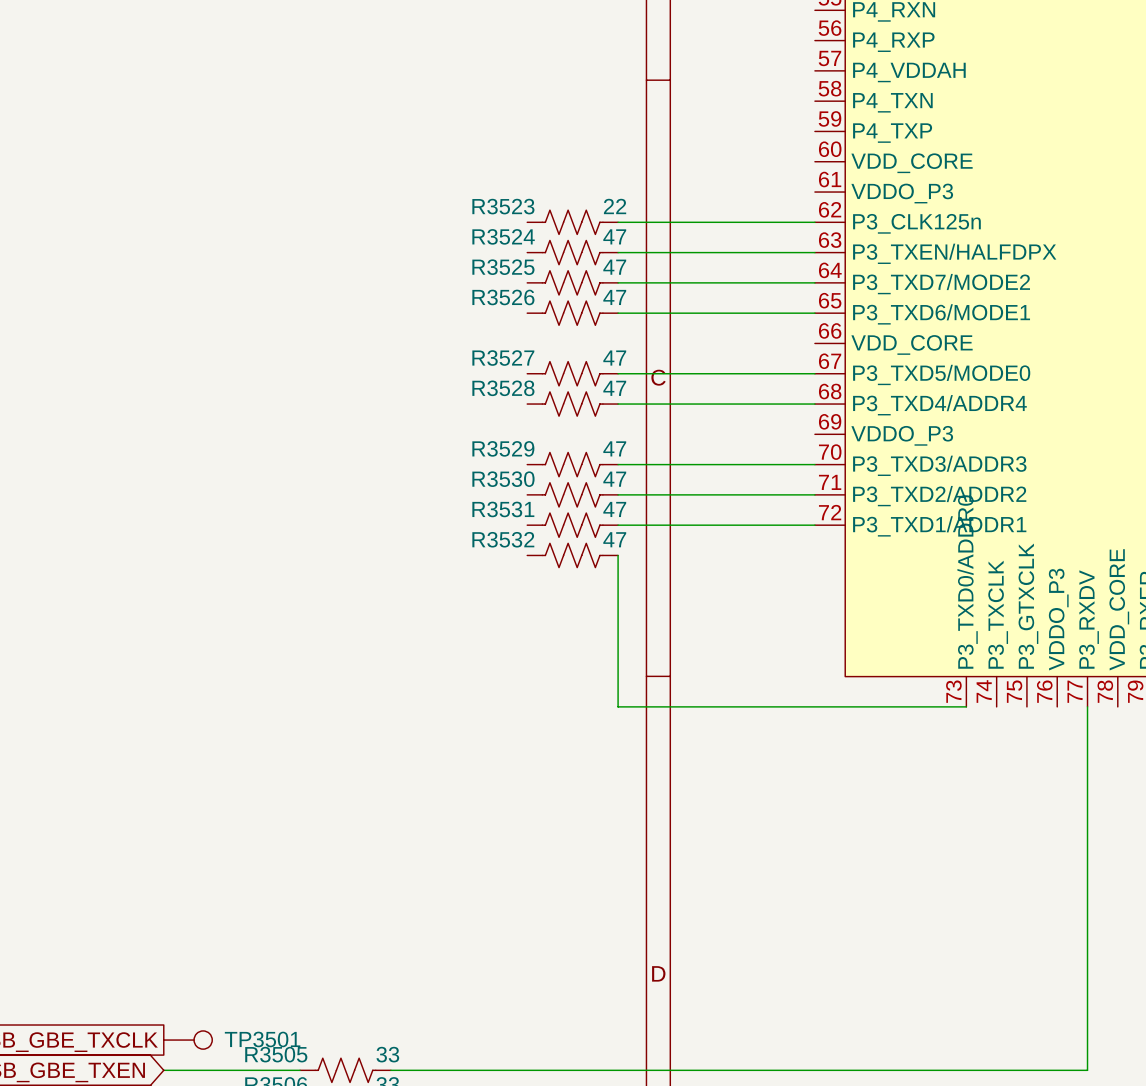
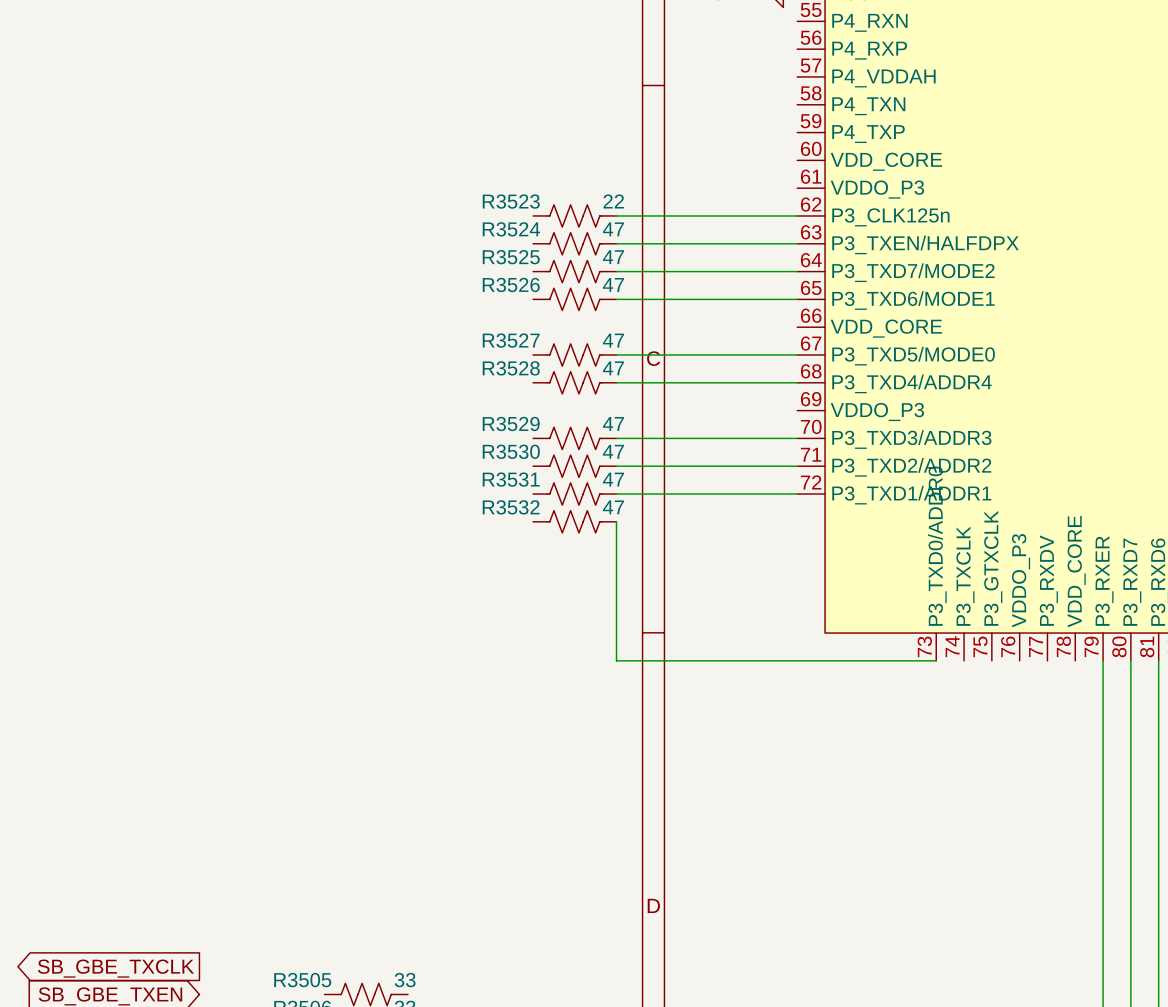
wire: (1087, 706) (1087, 1070) (390, 1070) -> none
TP3501: (188, 1040) -> none
wire: (163, 1070) (300, 1070) -> none

